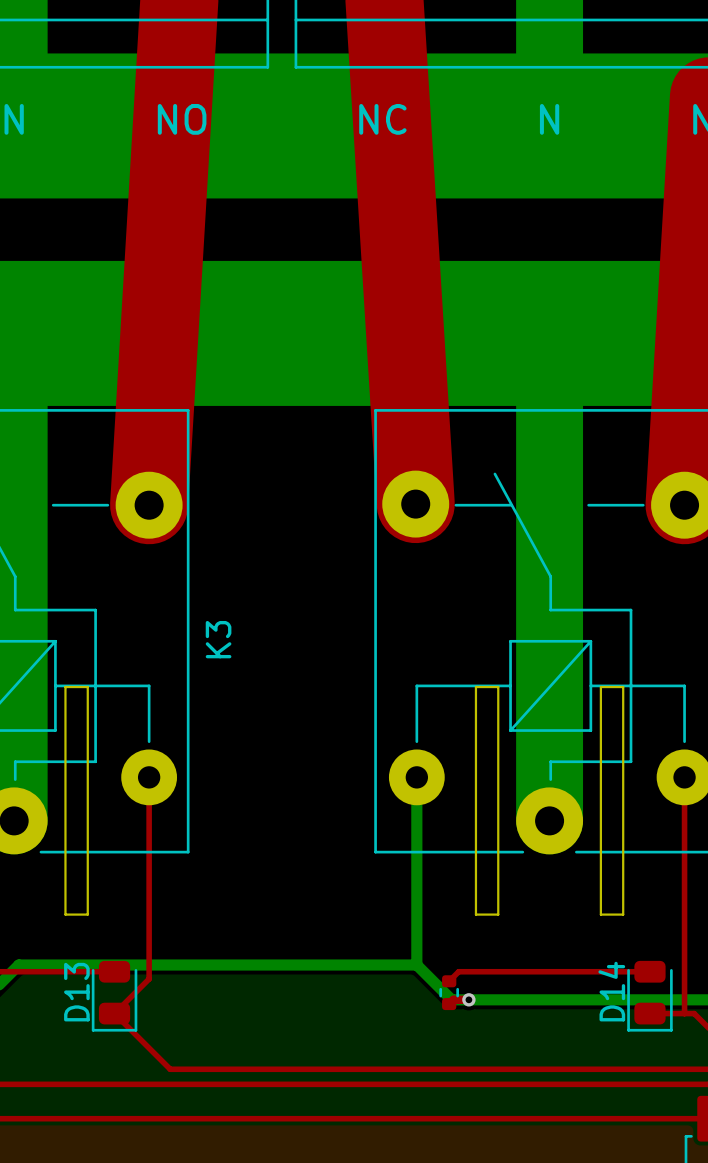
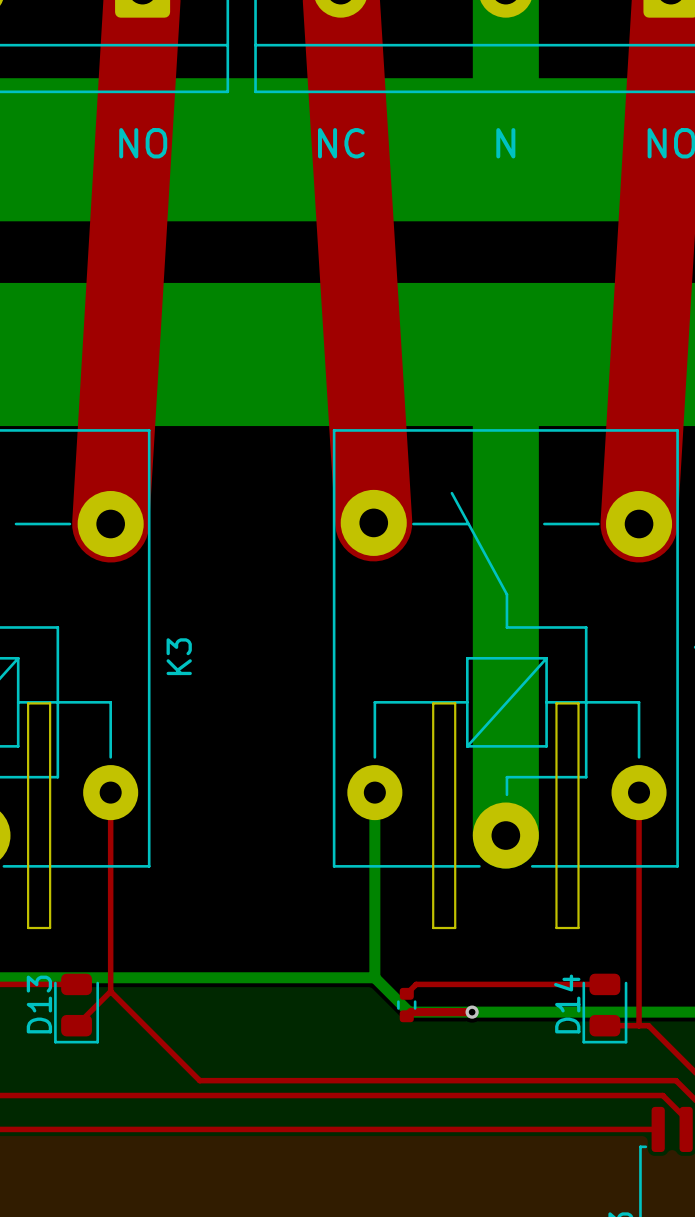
top track: none -> (426, 1012) (472, 1012)
via position: (468, 999) -> (472, 1012)
top track: (114, 1013) (170, 1069) (239, 1069) -> (110, 991) (199, 1080)

